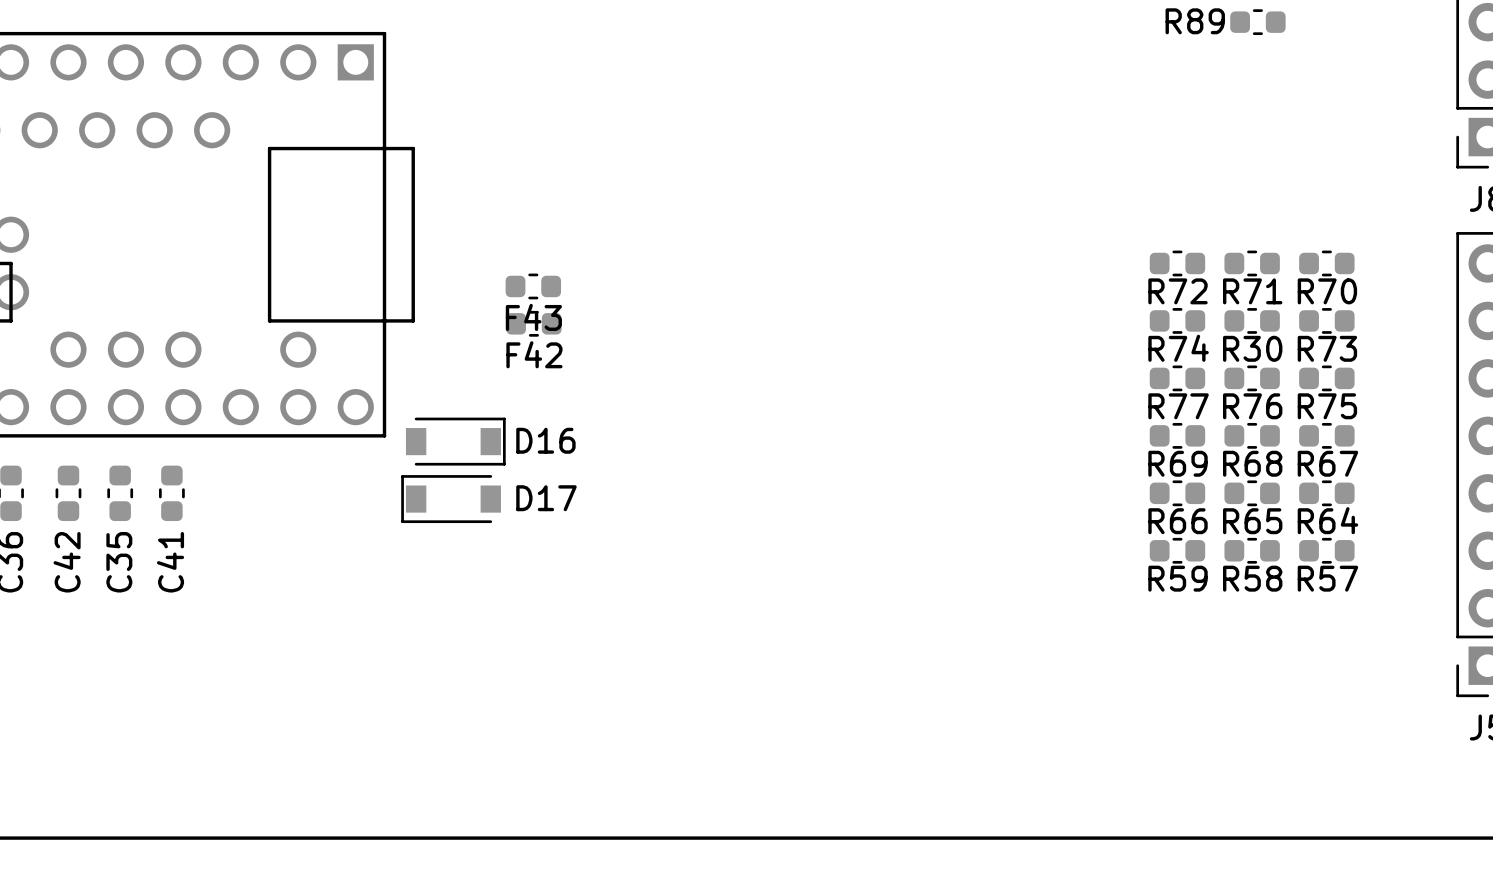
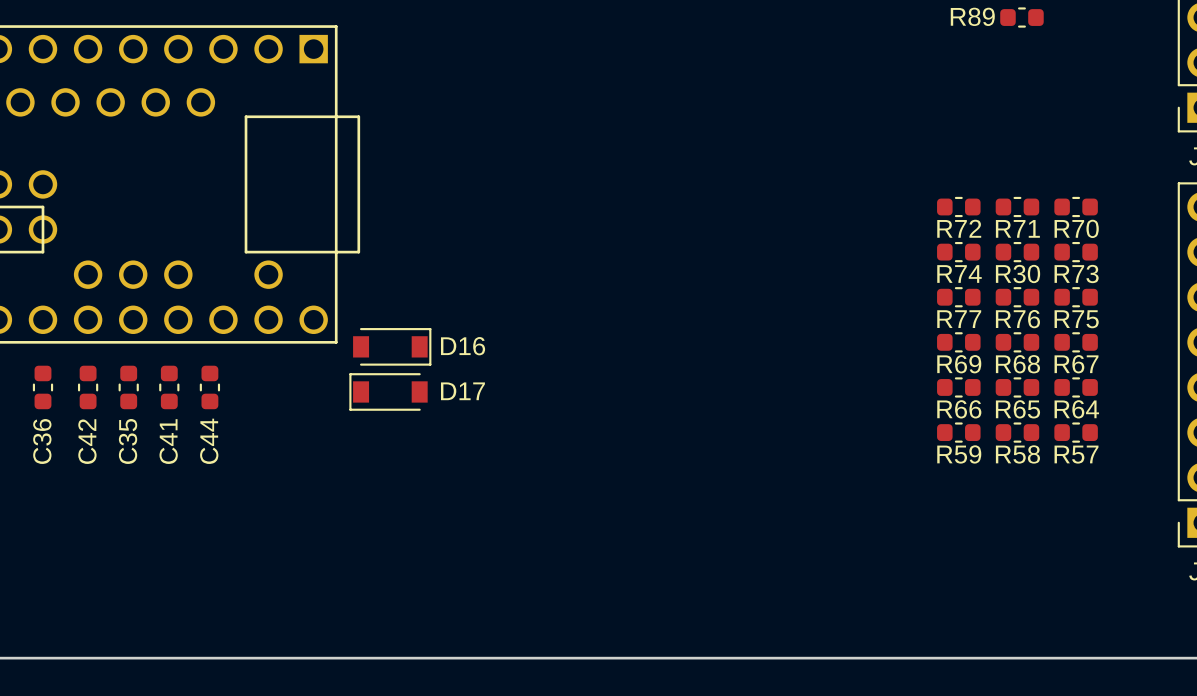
F43: (533, 286) -> none
F42: (533, 323) -> none
C44: none -> (209, 387)

